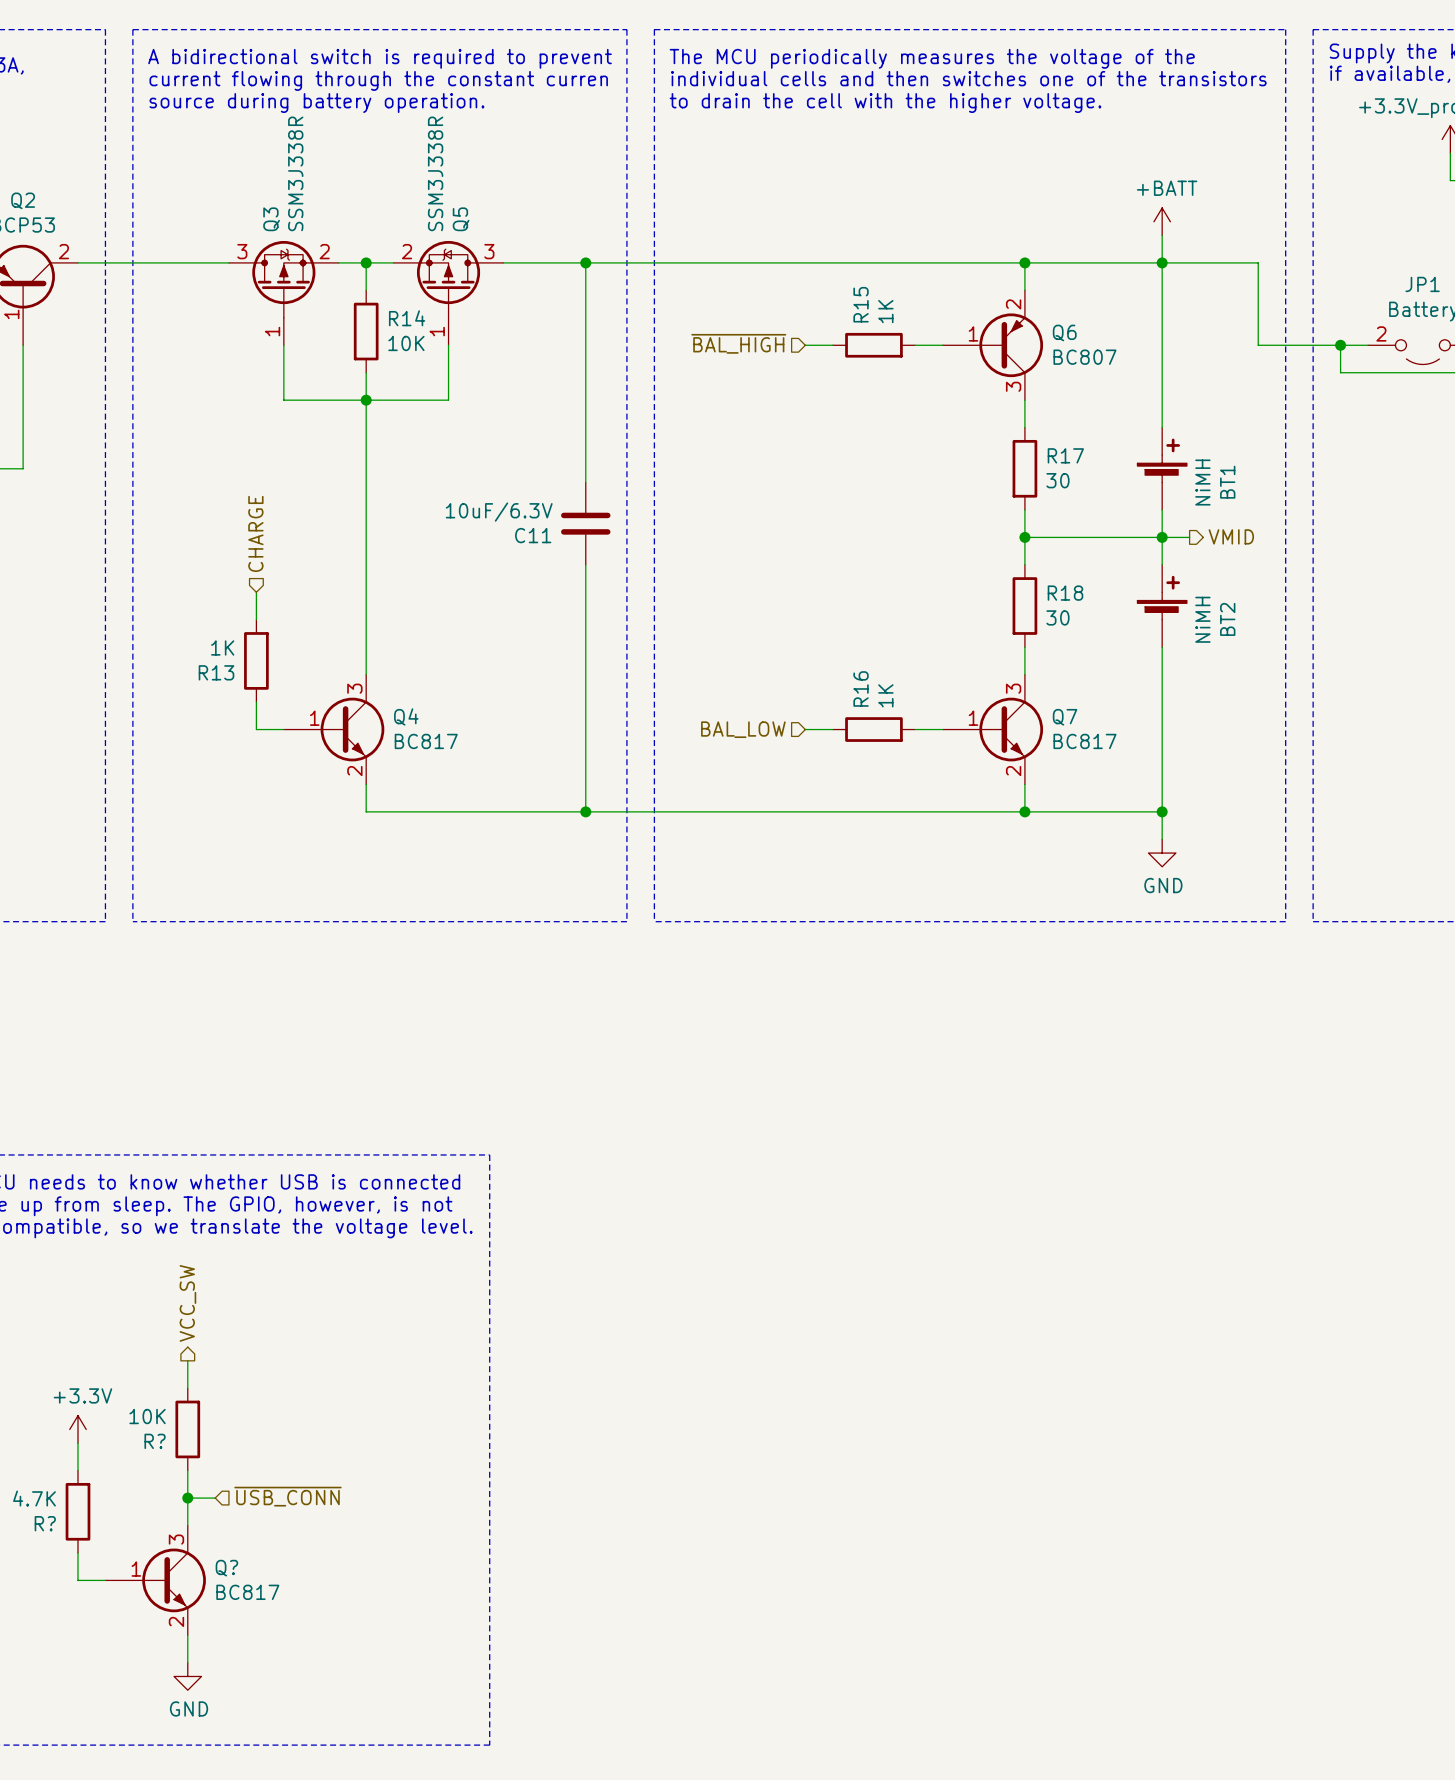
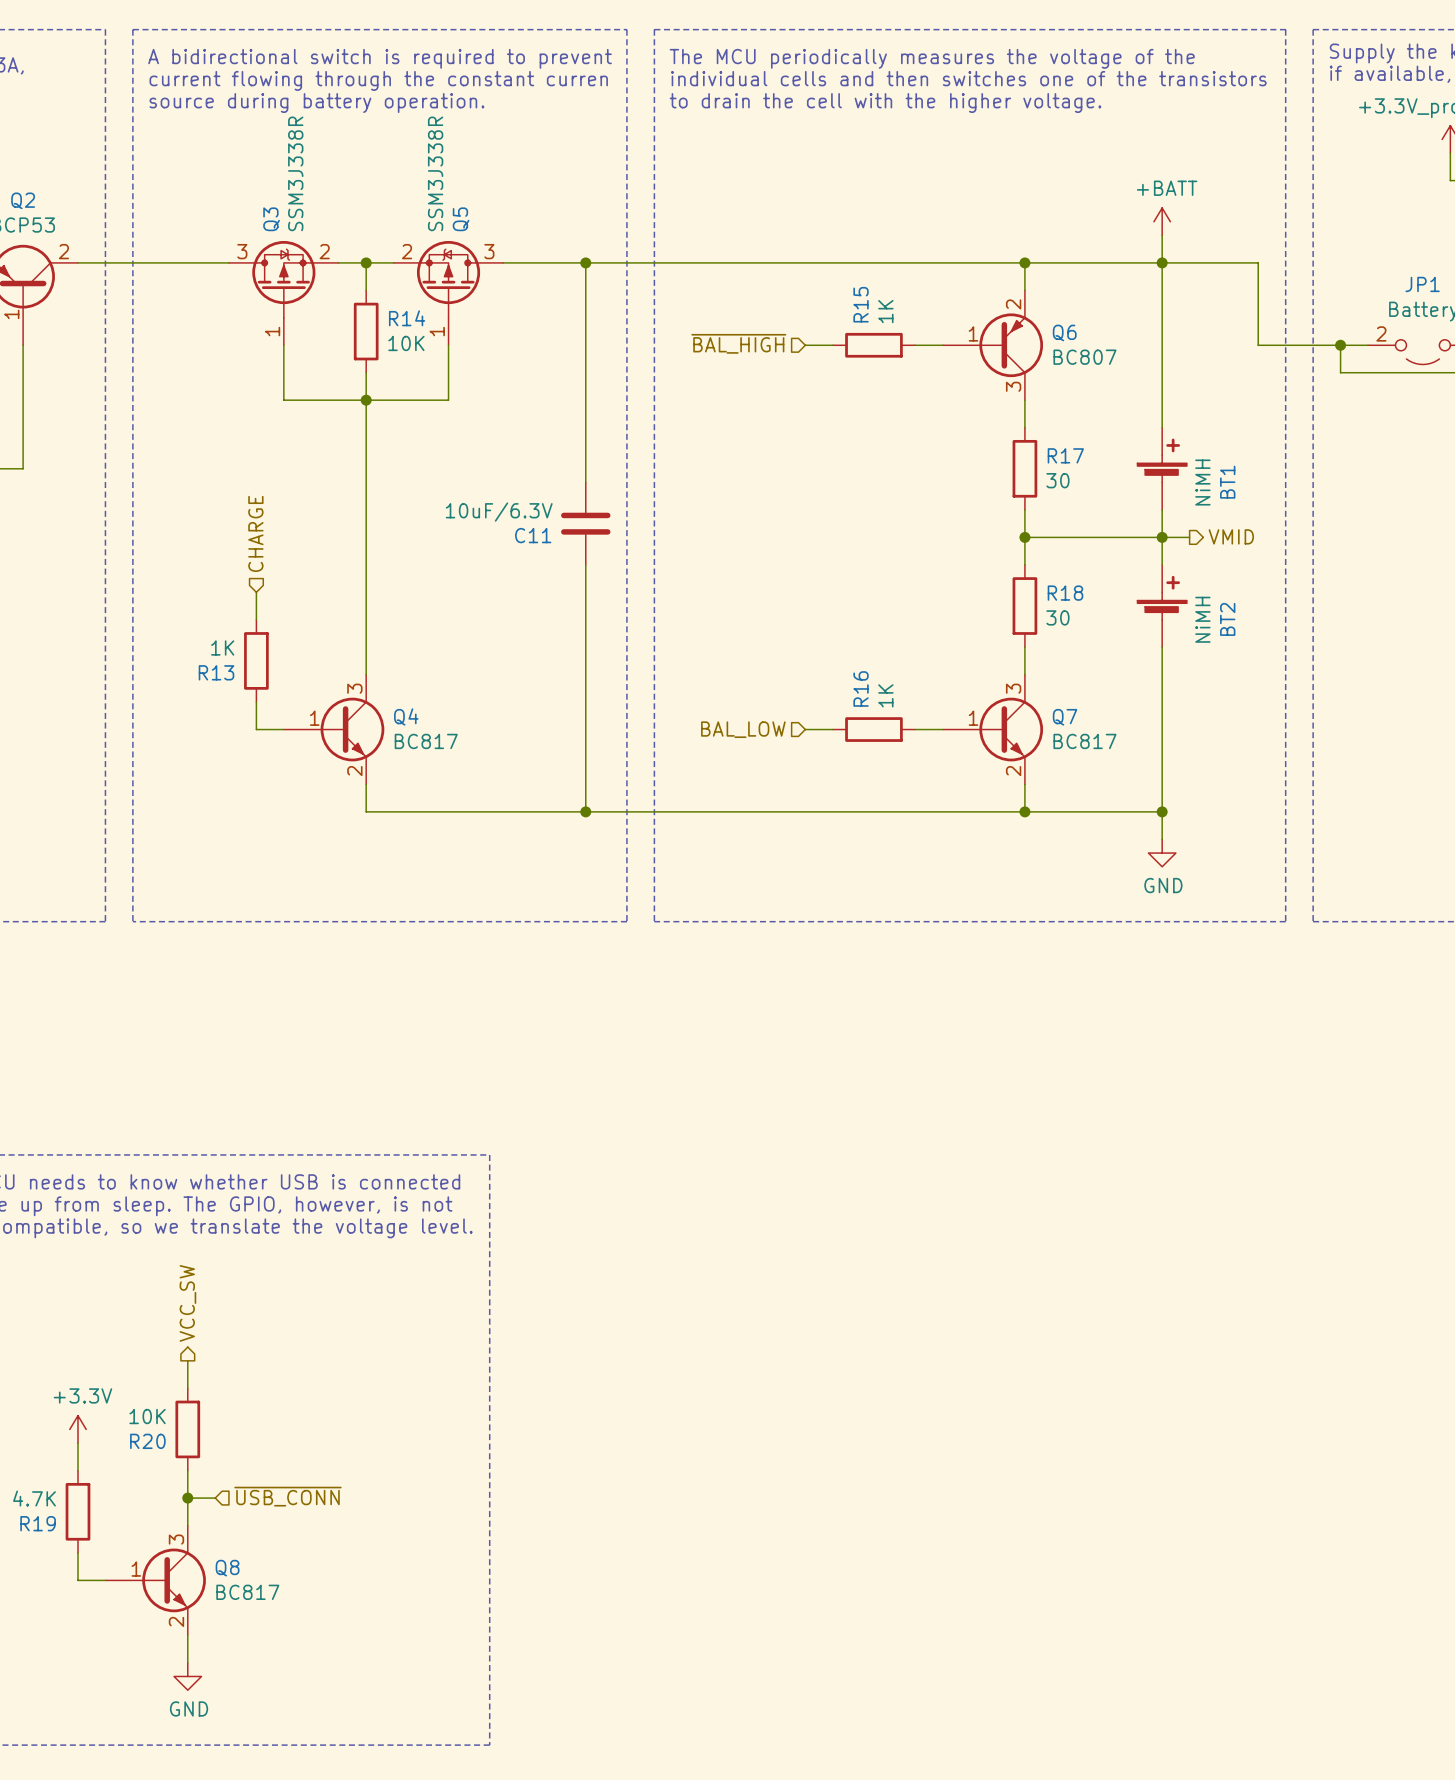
R? name: R? (155, 1441) -> R20 (147, 1441)
R? name: R? (45, 1523) -> R19 (38, 1523)
Q? name: Q? (226, 1568) -> Q8 (227, 1568)

